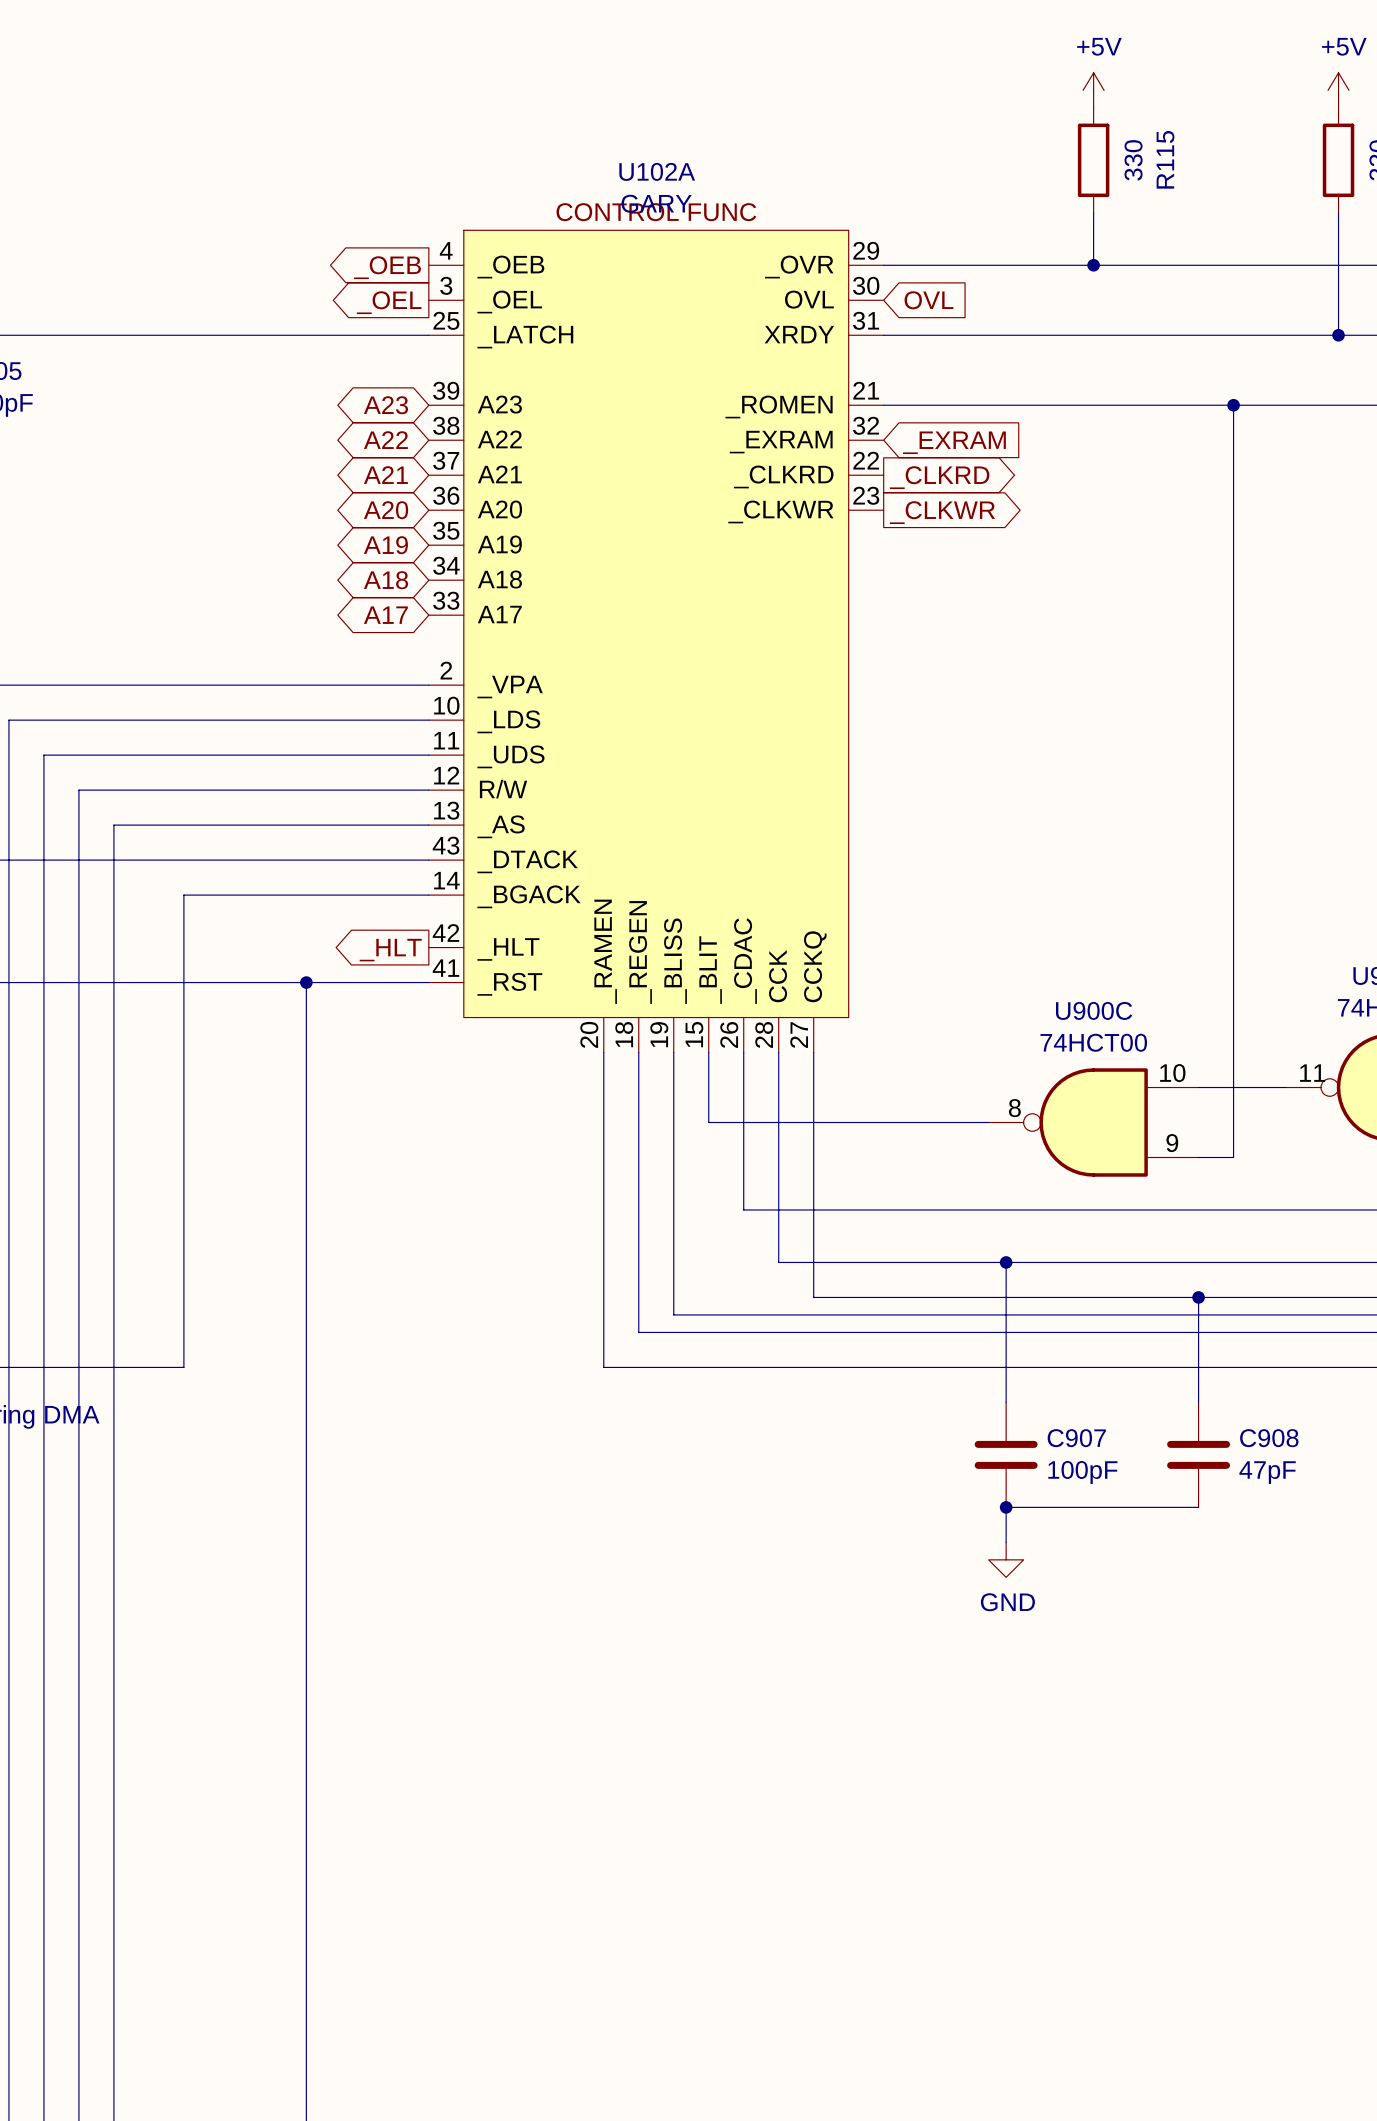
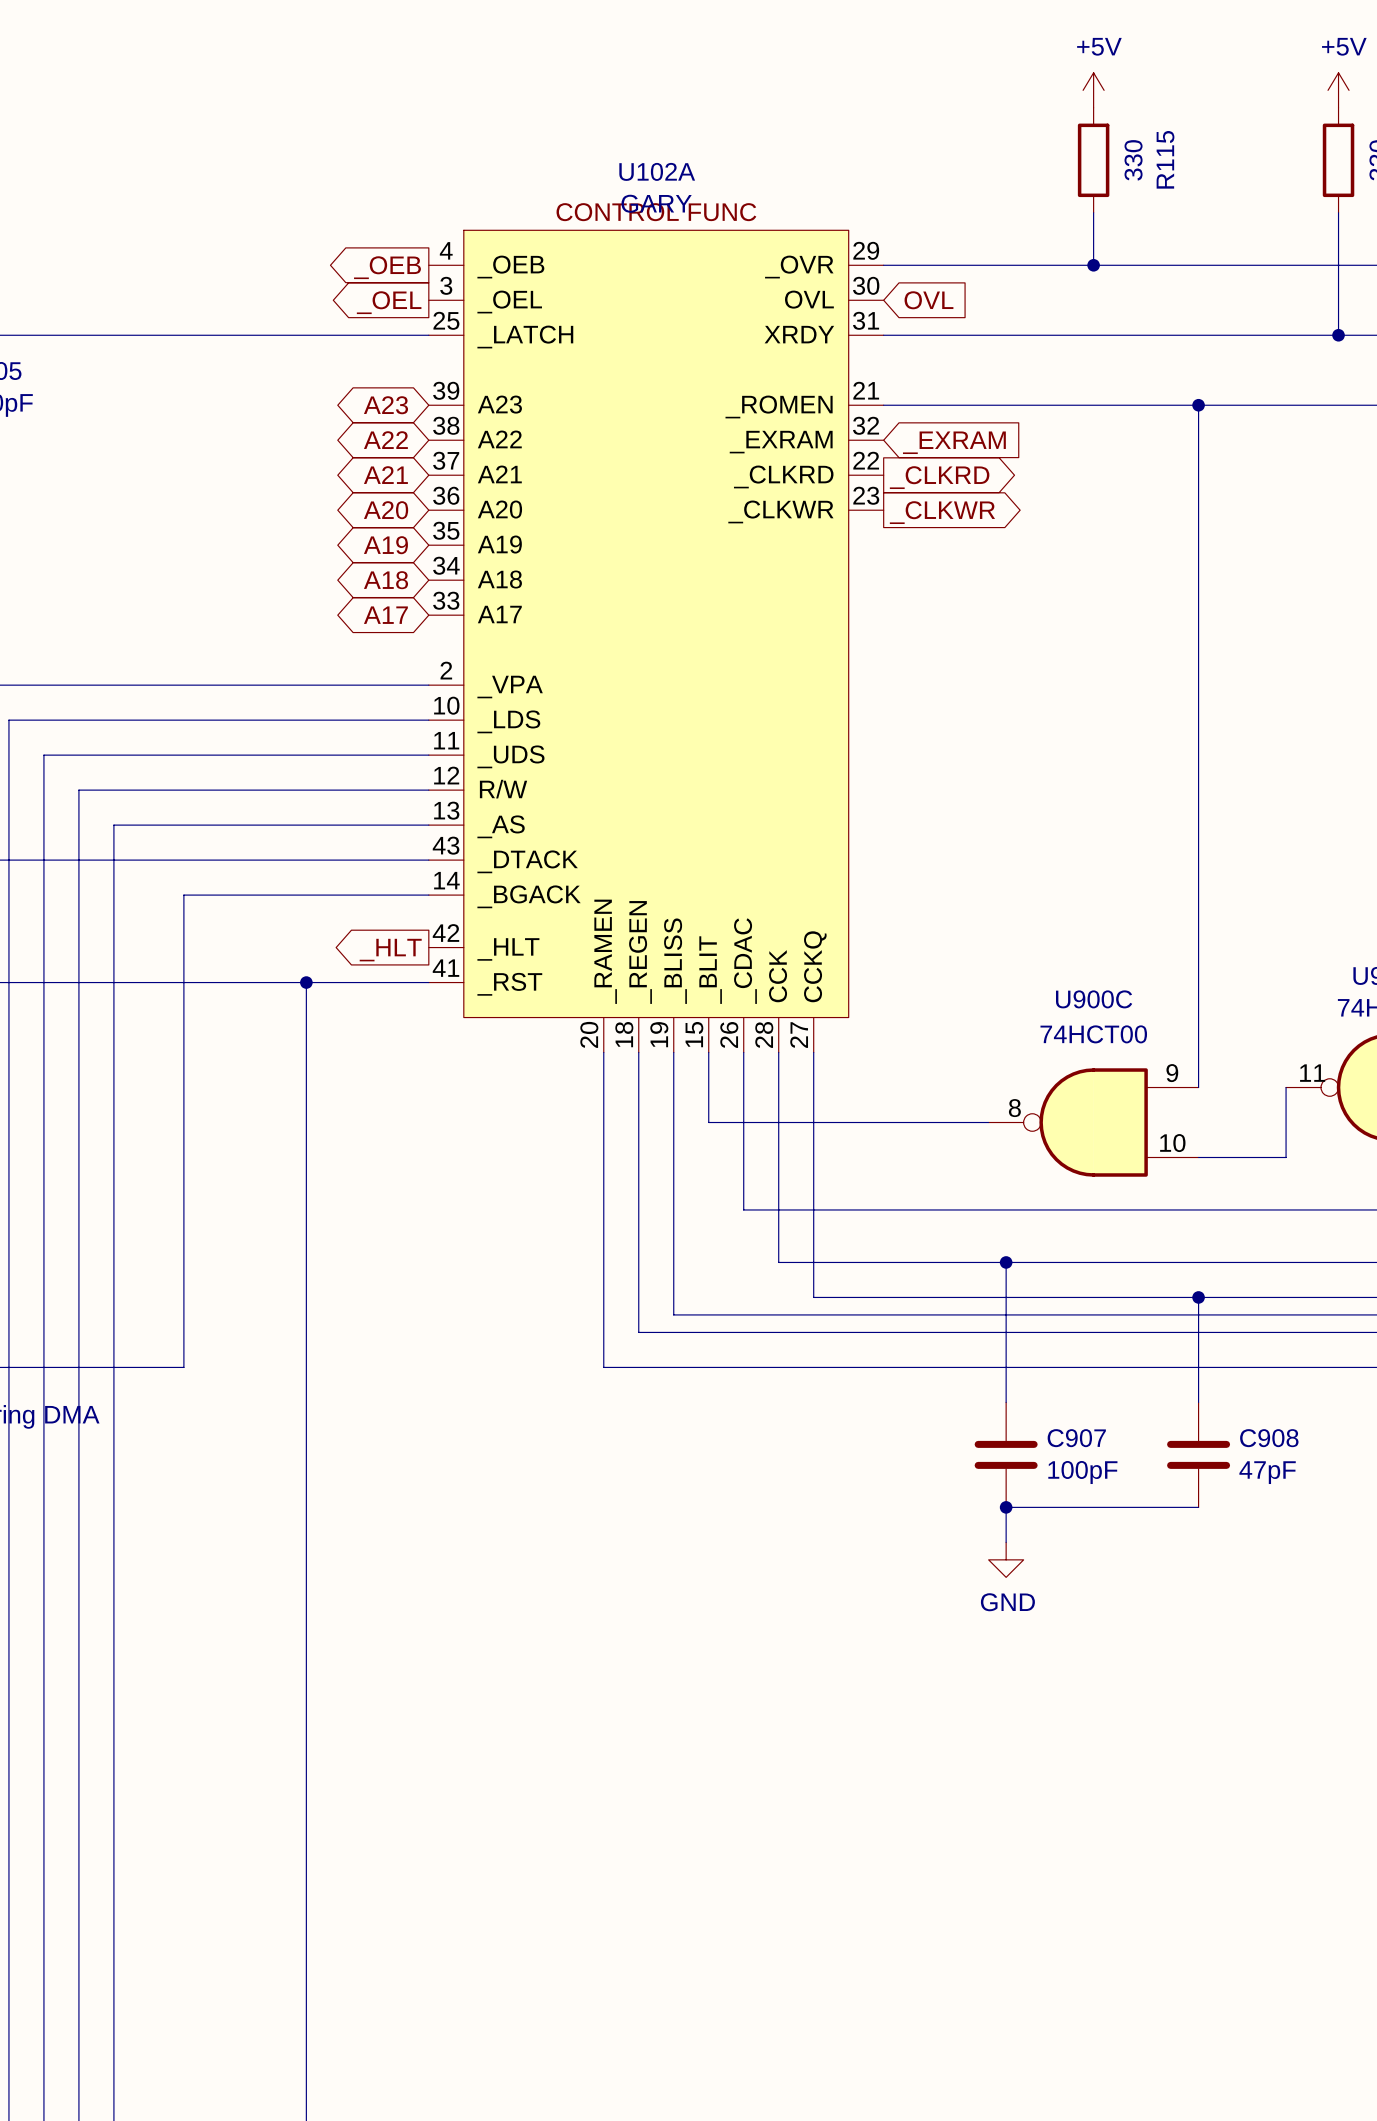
wire: none -> (1198, 405) (1198, 1087)
wire: (1233, 405) (1233, 1157) -> none
junction position: (1233, 405) -> (1198, 405)
wire: (1198, 1087) (1286, 1087) -> (1233, 1157) (1286, 1157) (1286, 1087)
U900C flip: as is (1093, 1122) -> up-down (1093, 1122)

